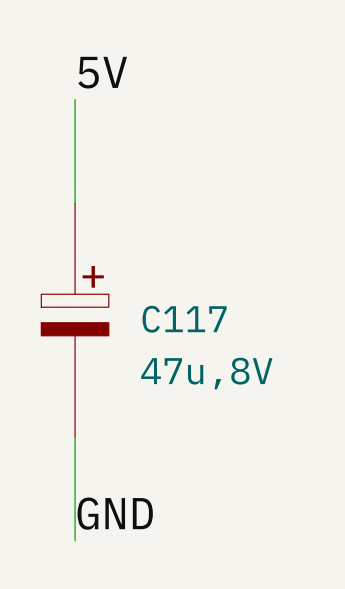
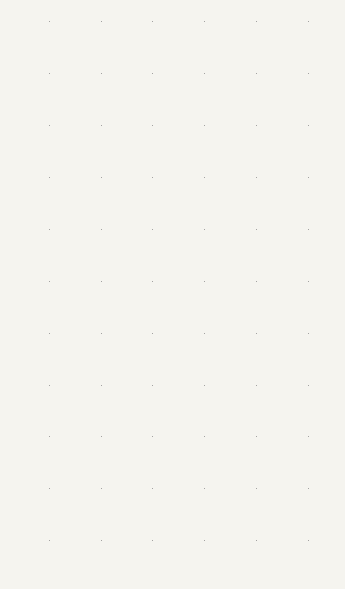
label: 5V (102, 72) -> none
wire: (75, 99) (75, 203) -> none
C117: 47u,8V (75, 320) -> none
wire: (75, 436) (75, 540) -> none
label: GND (115, 513) -> none

